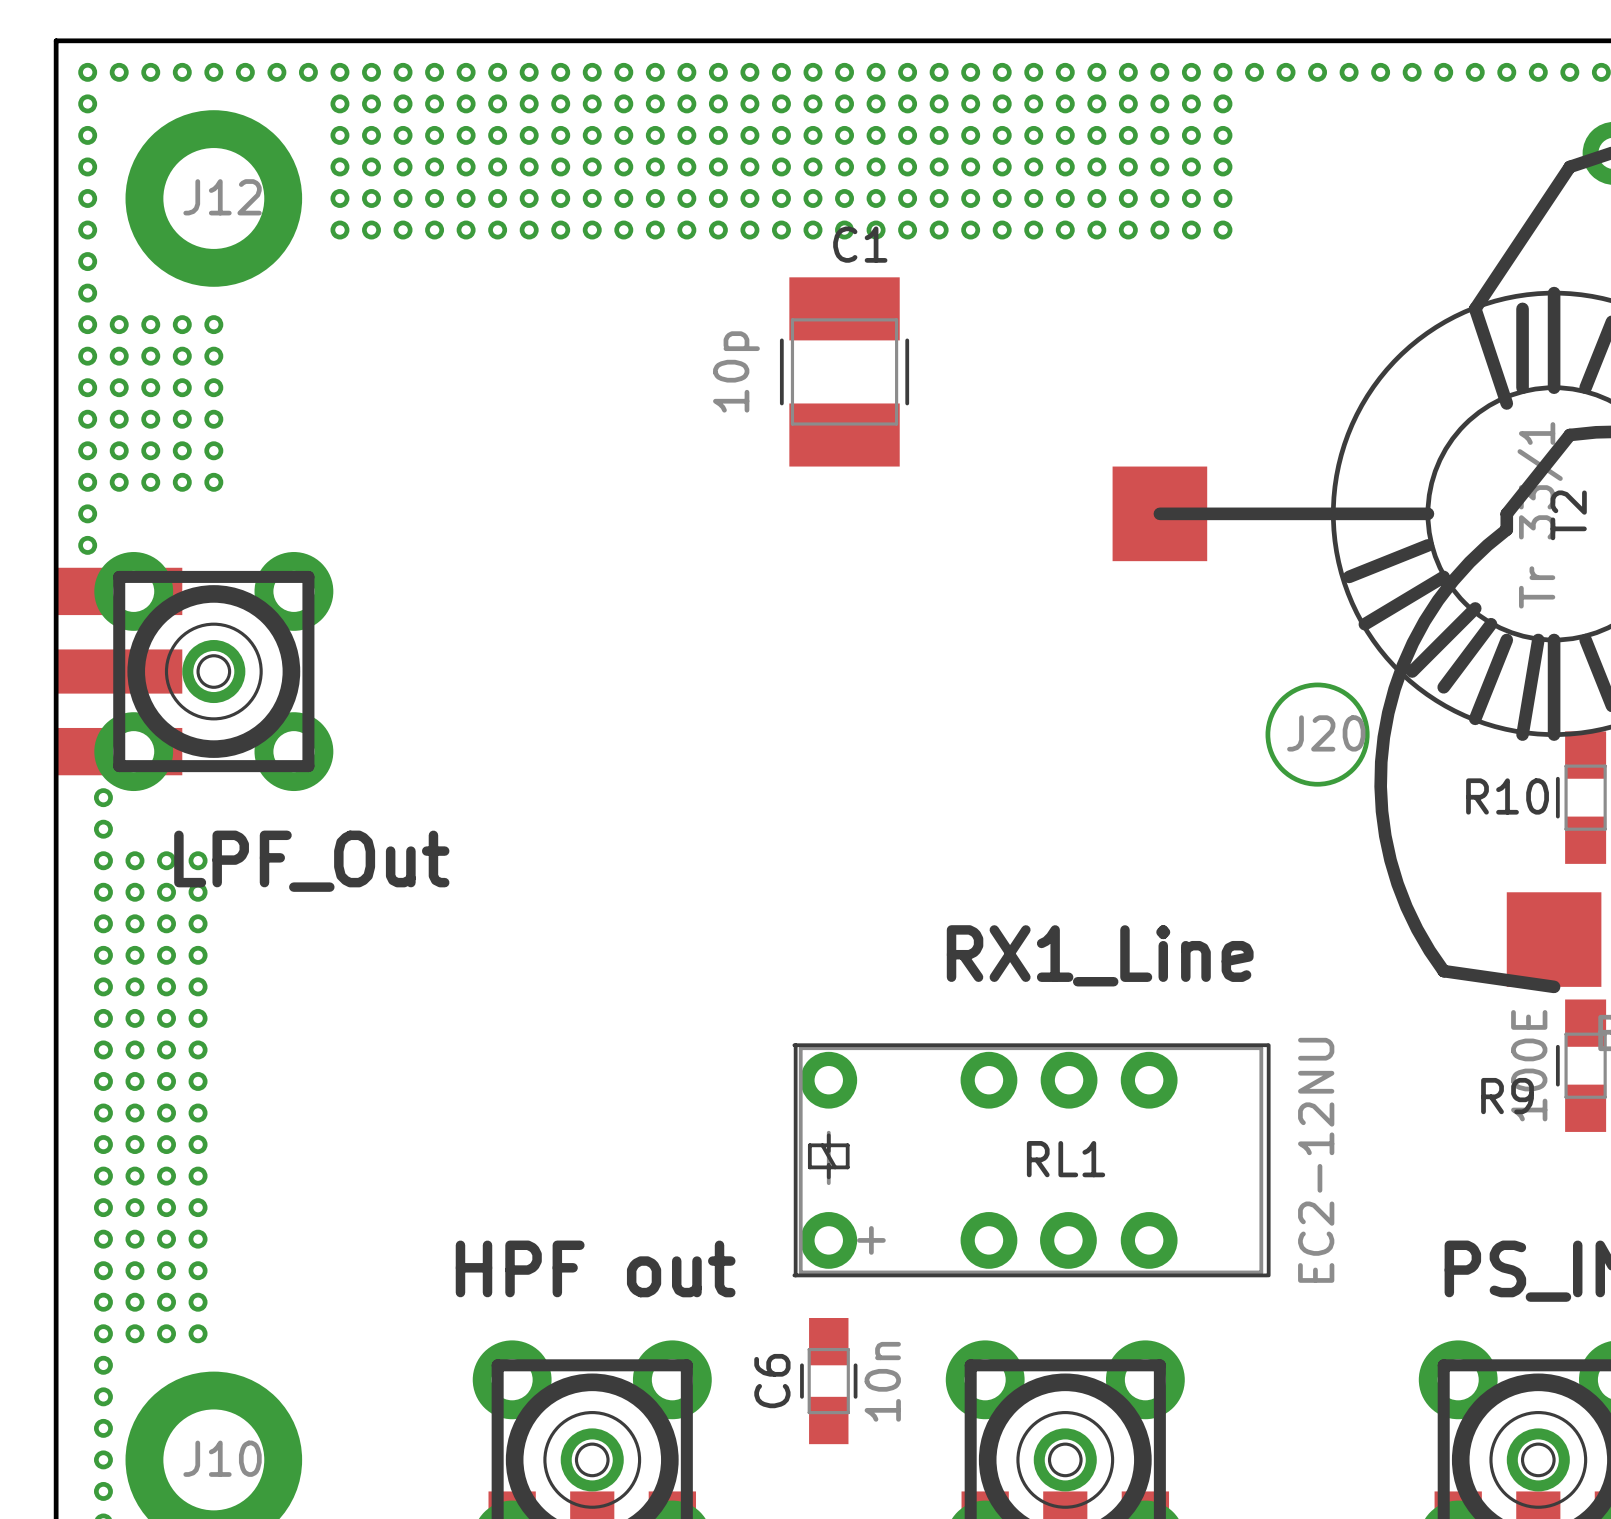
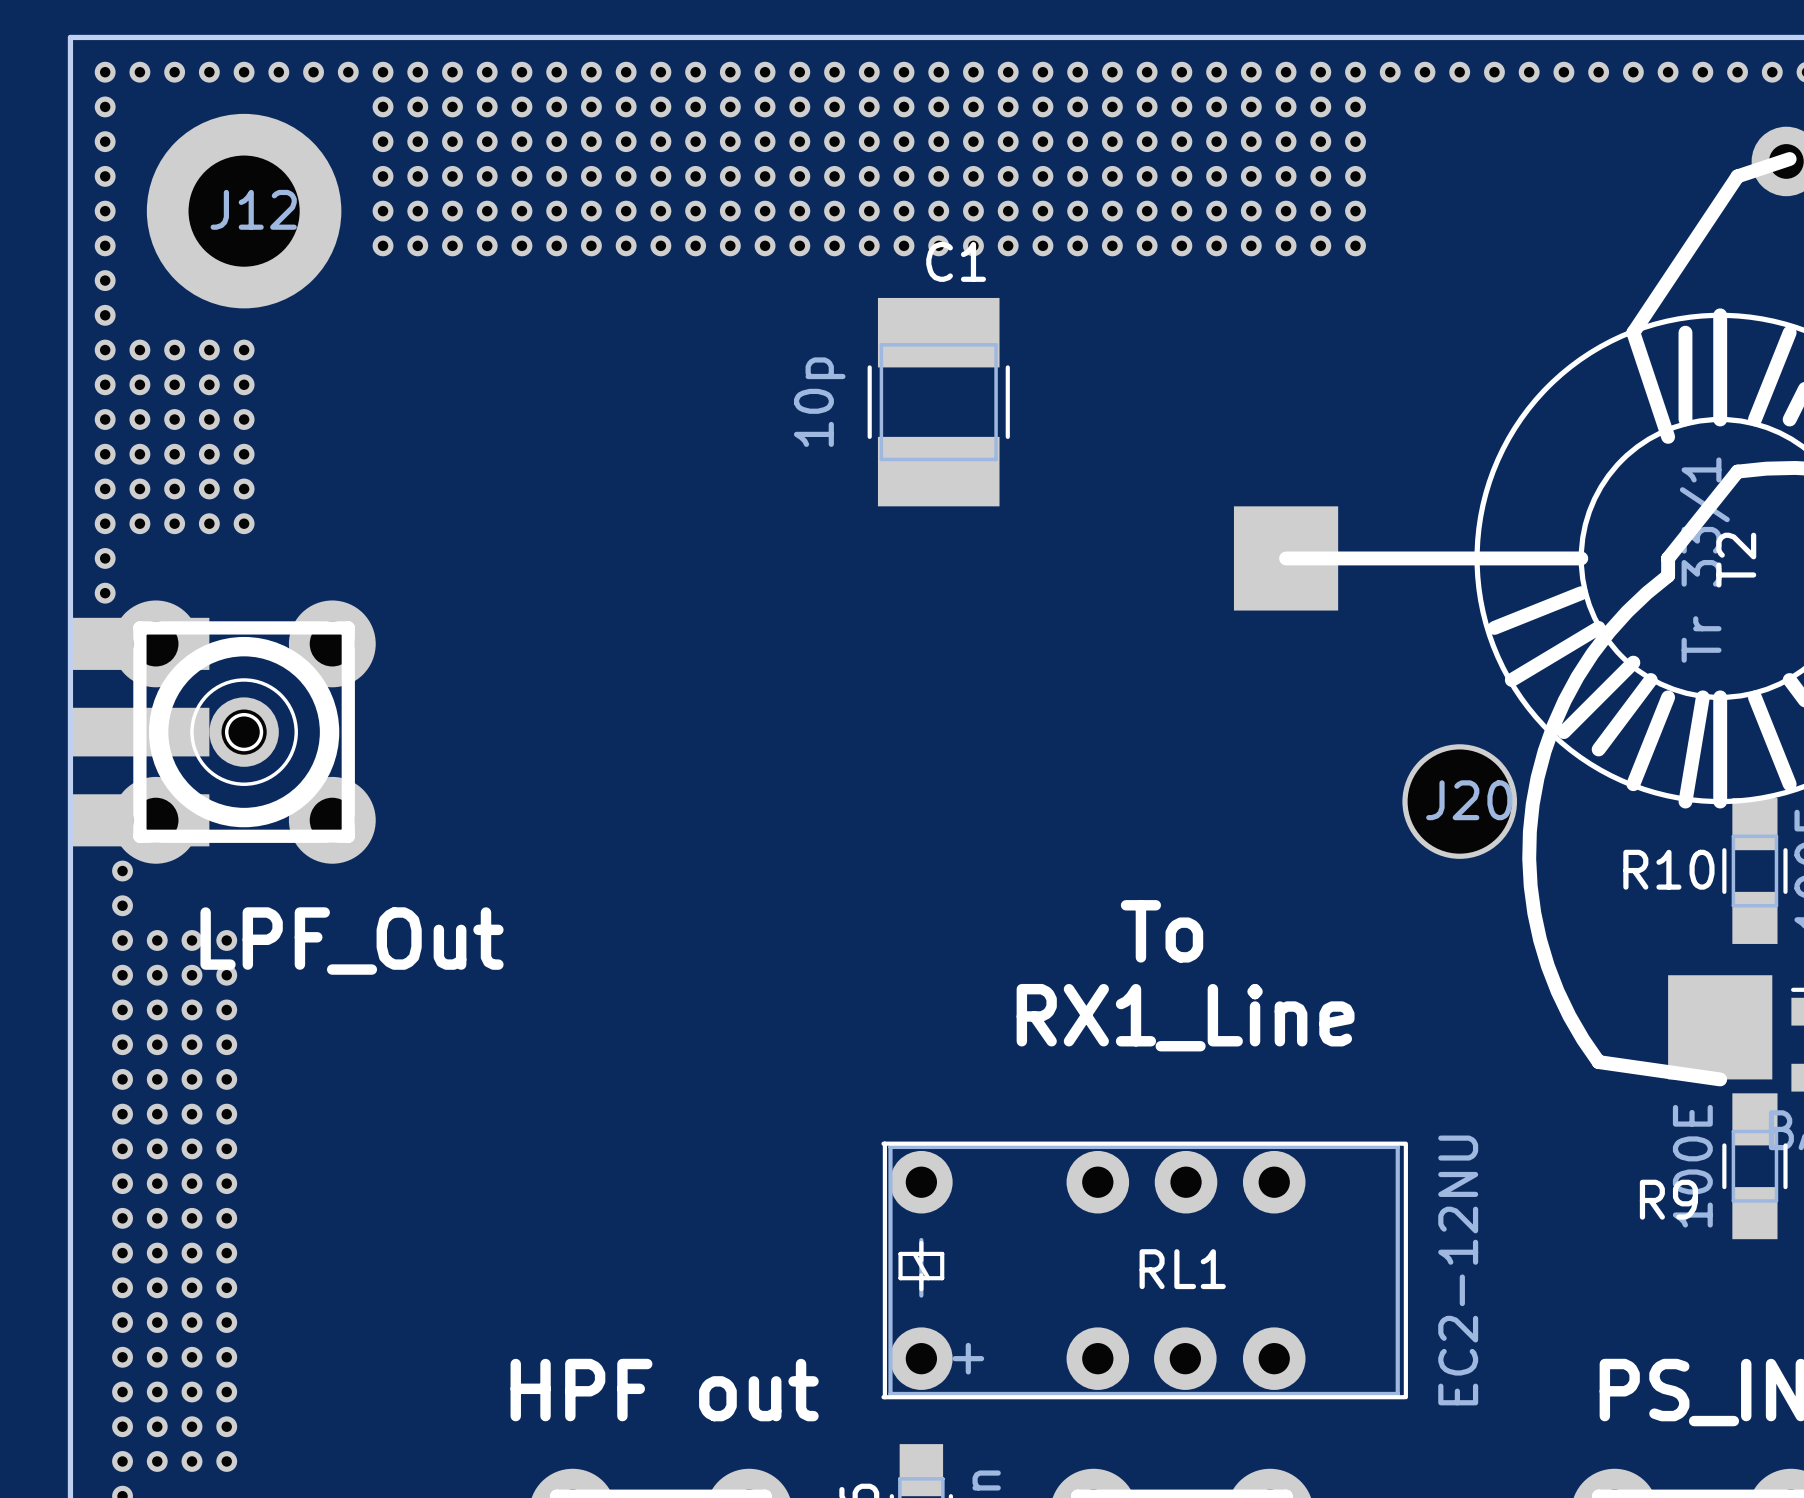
text: none -> To (1162, 931)
text position: RX1_Line (1100, 955) -> RX1_Line (1185, 1017)

